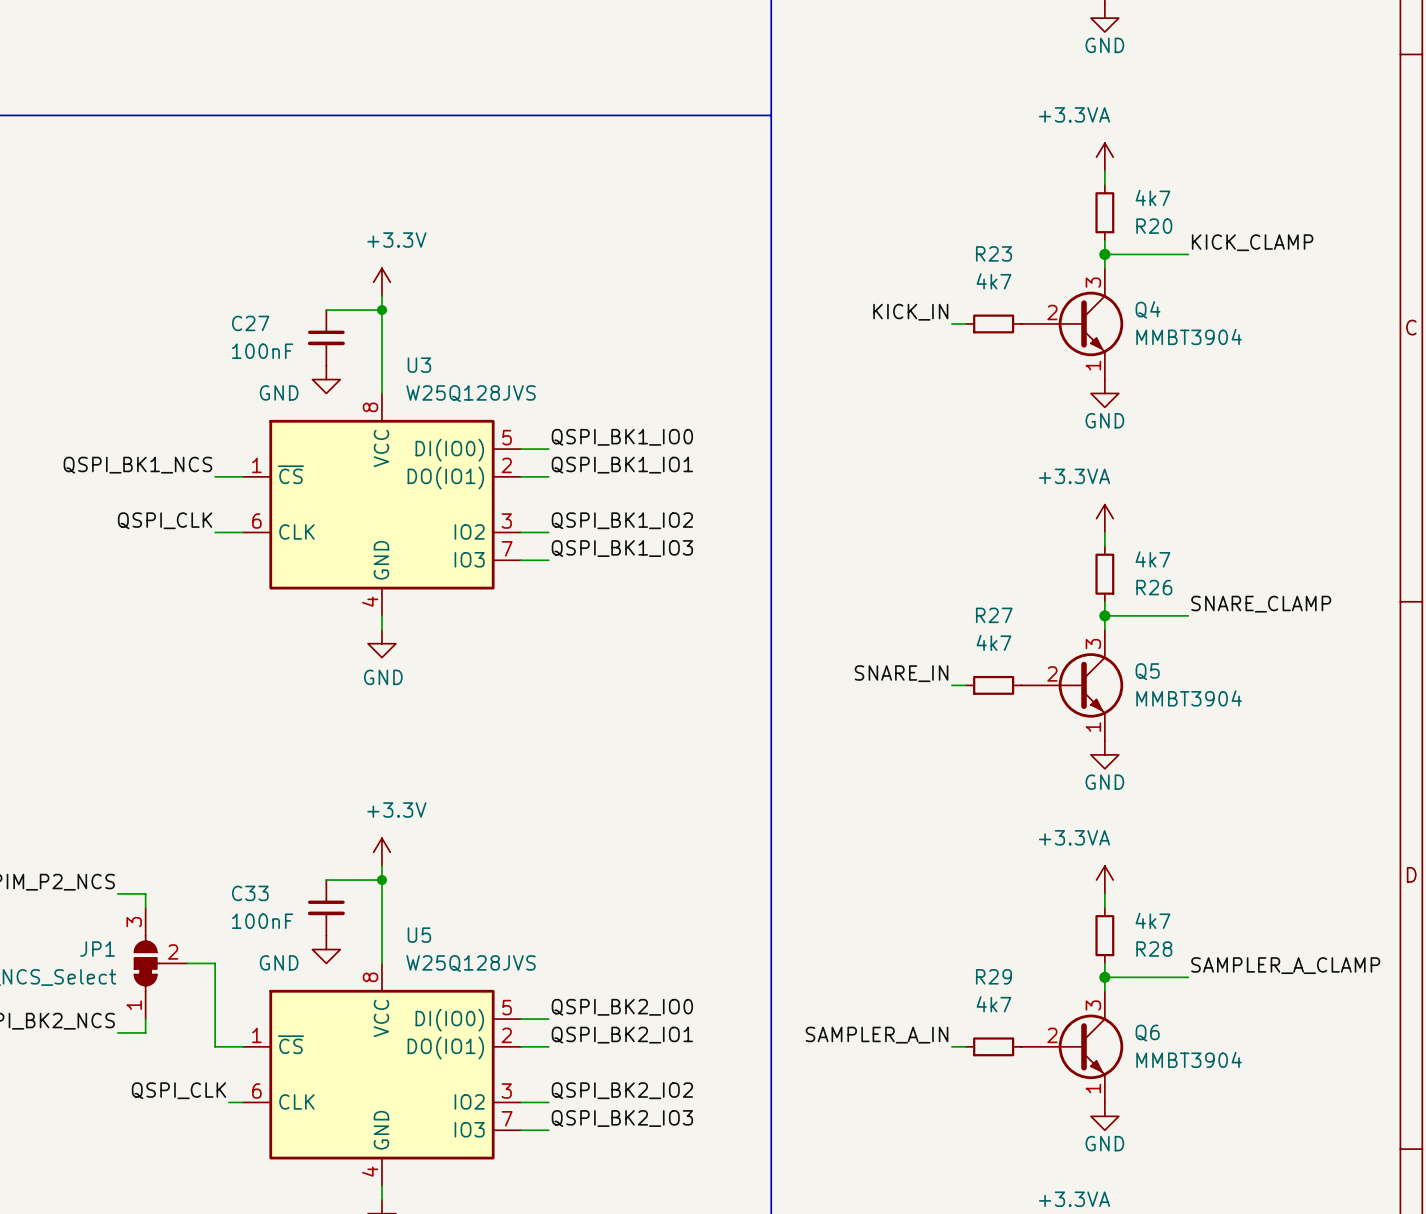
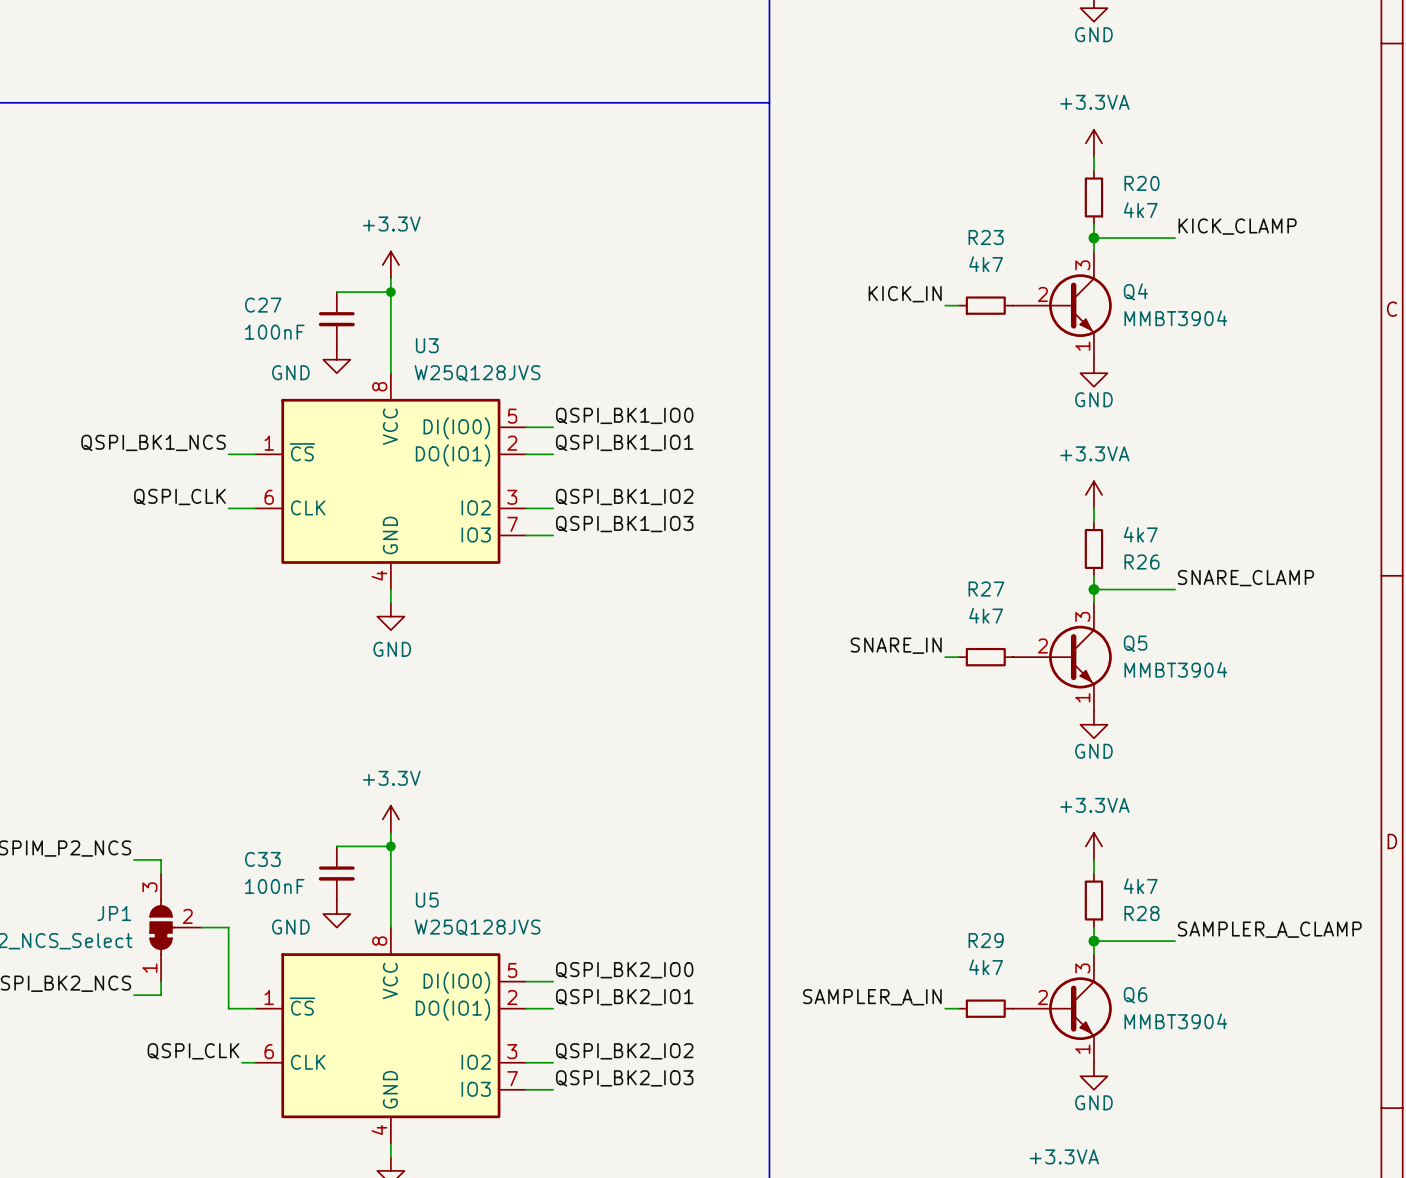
power symbol text position: +3.3VA (1074, 114) -> +3.3VA (1094, 102)
R20 value position: 4k7 (1152, 197) -> 4k7 (1140, 210)
R20 name position: R20 (1154, 226) -> R20 (1142, 183)
power symbol text position: +3.3V (396, 240) -> +3.3V (391, 223)
power symbol text position: +3.3VA (1074, 476) -> +3.3VA (1094, 453)
power symbol text position: +3.3V (396, 810) -> +3.3V (391, 778)
power symbol text position: +3.3VA (1074, 837) -> +3.3VA (1094, 805)

